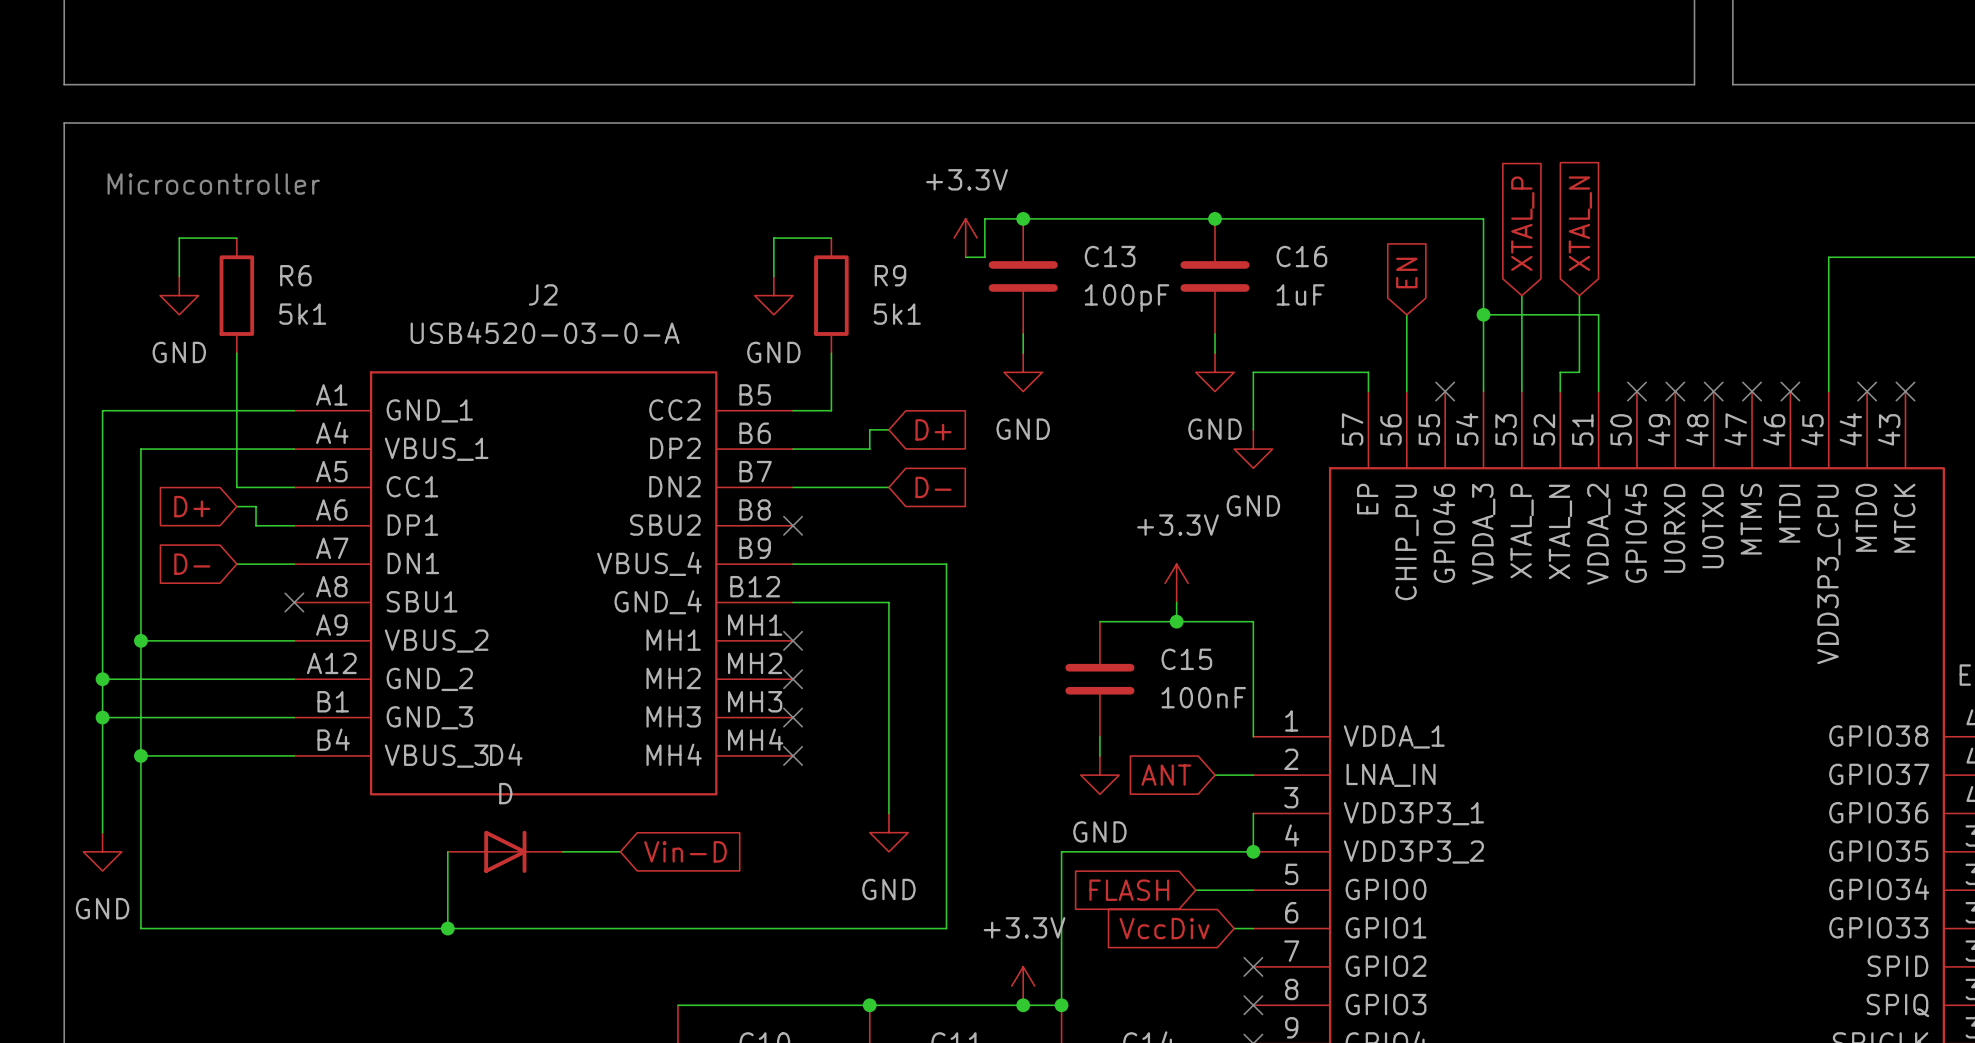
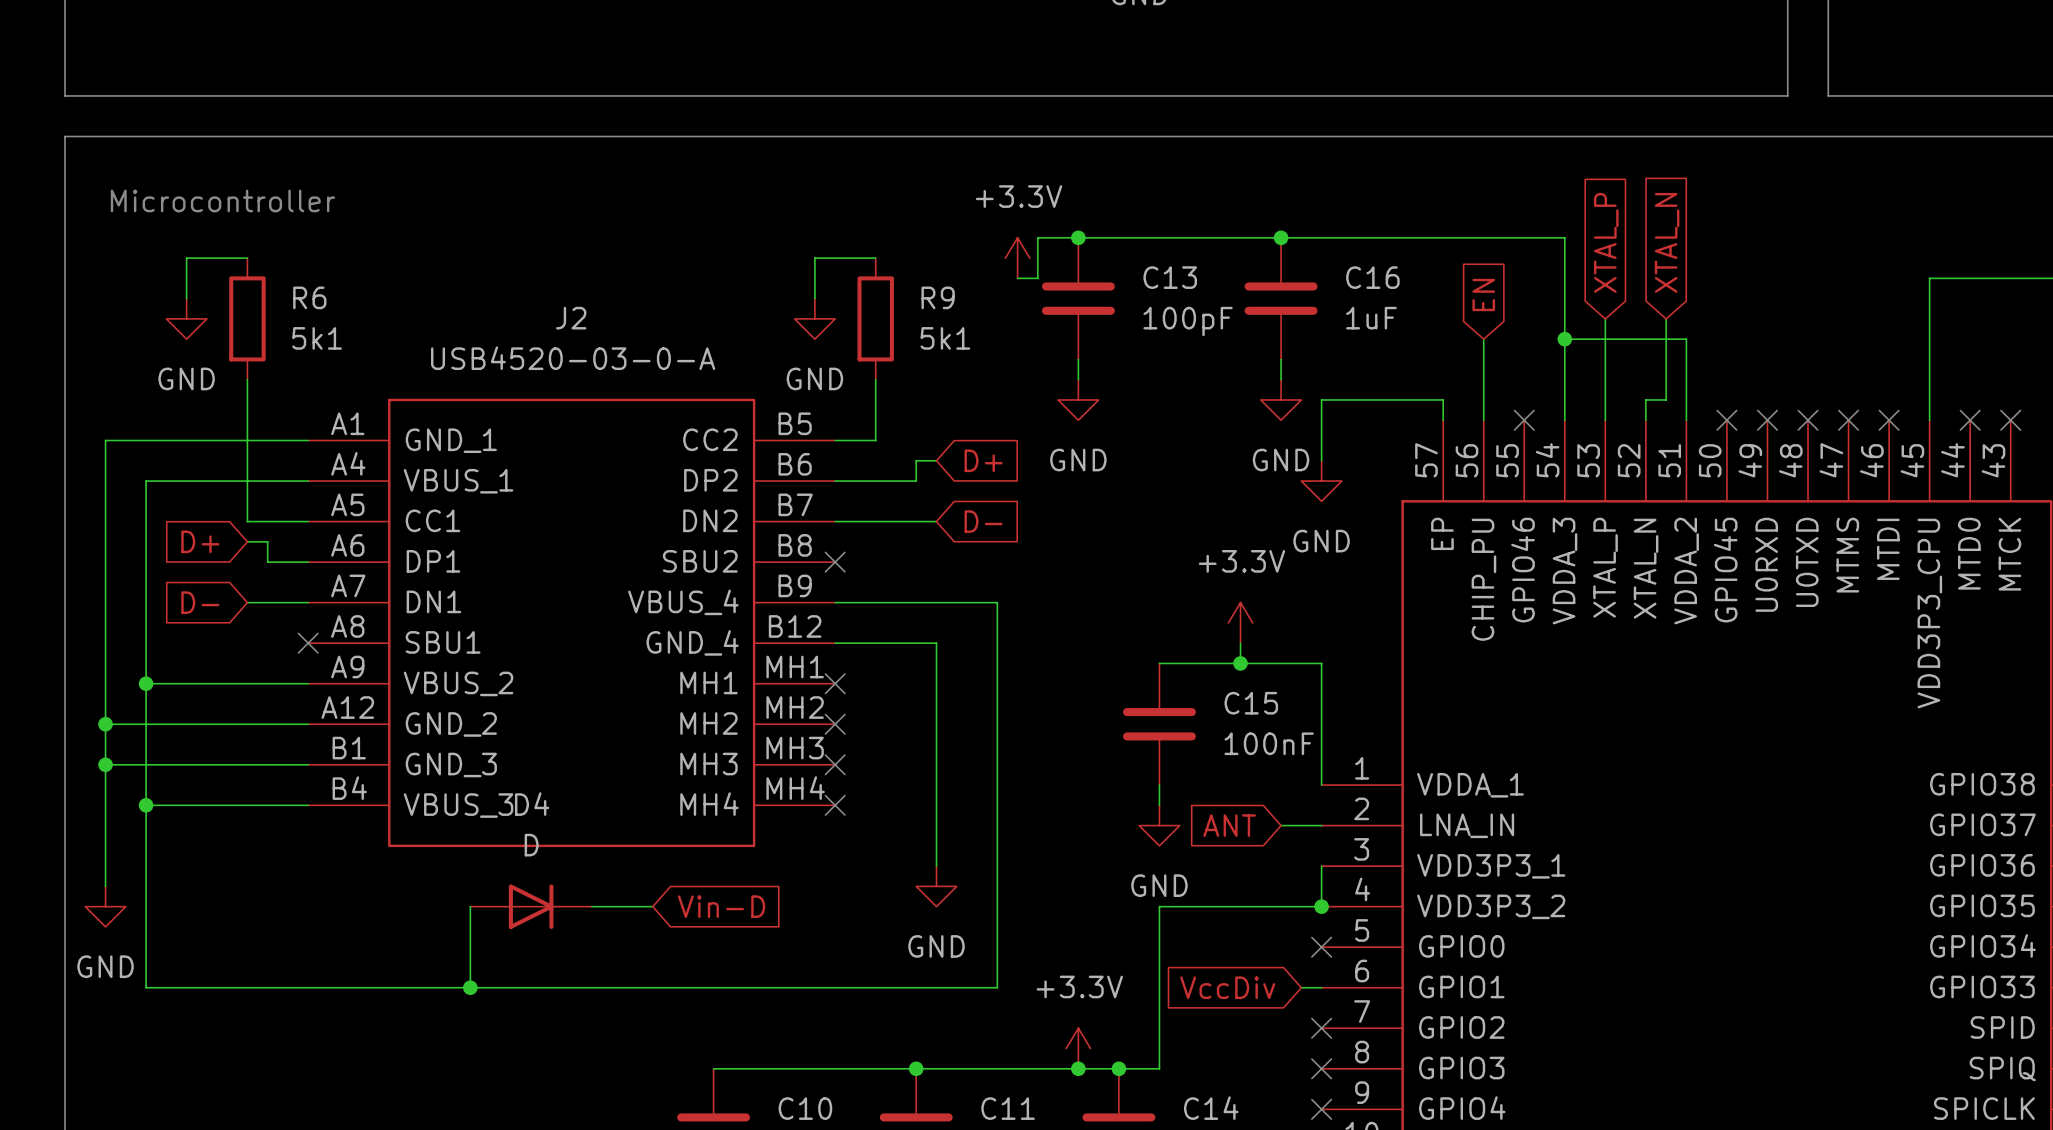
wire: (1099, 851) (1061, 851) (1061, 1005) -> (1159, 906) (1159, 1068) (1118, 1068)
global label: FLASH (1129, 890) -> none
wire: (1195, 890) (1253, 890) -> none
no-connect mark: none -> (1321, 947)

